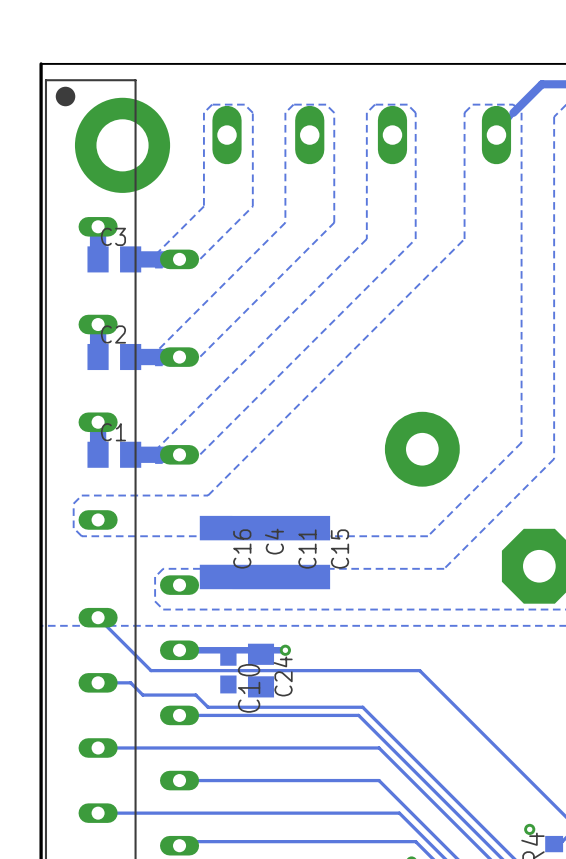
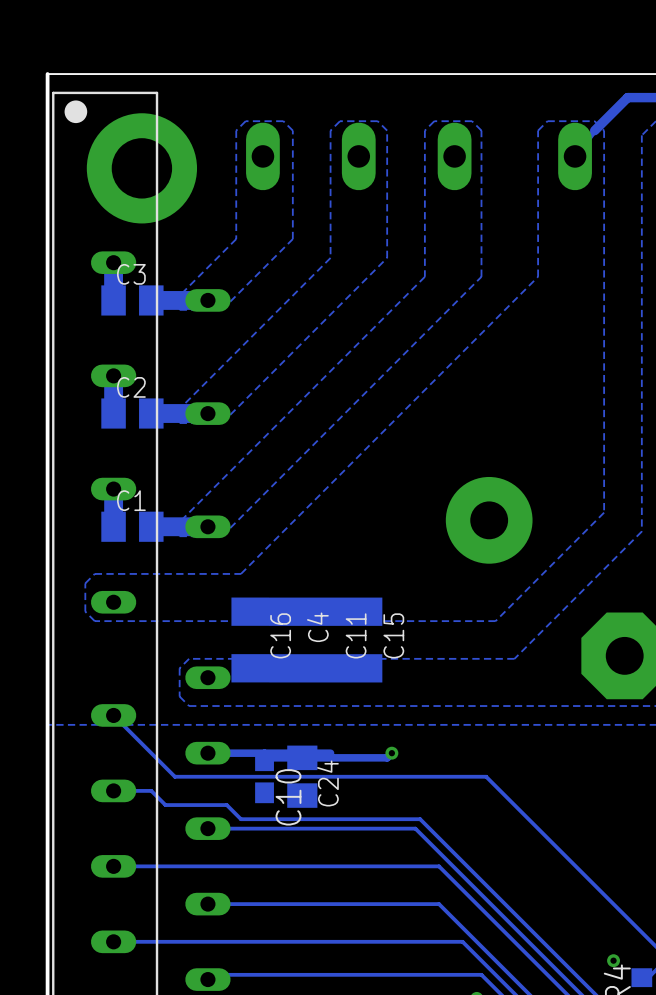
via position: (285, 650) -> (391, 753)
track: none -> (391, 753) (387, 757) (264, 757)

